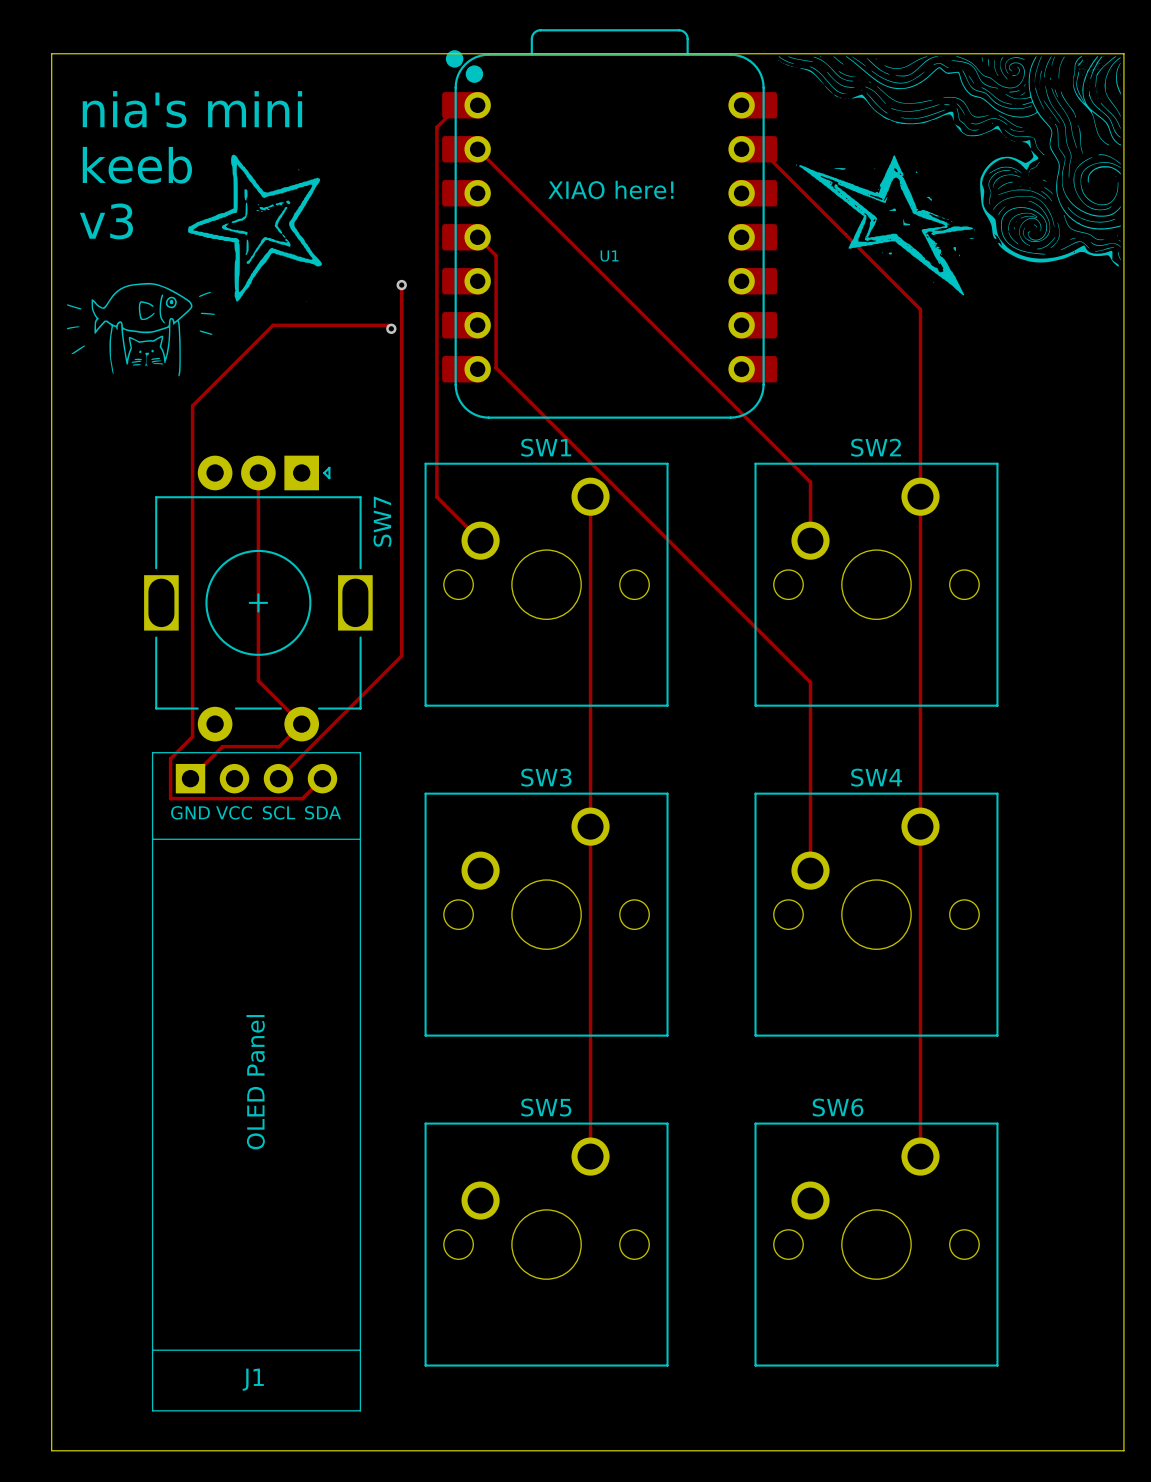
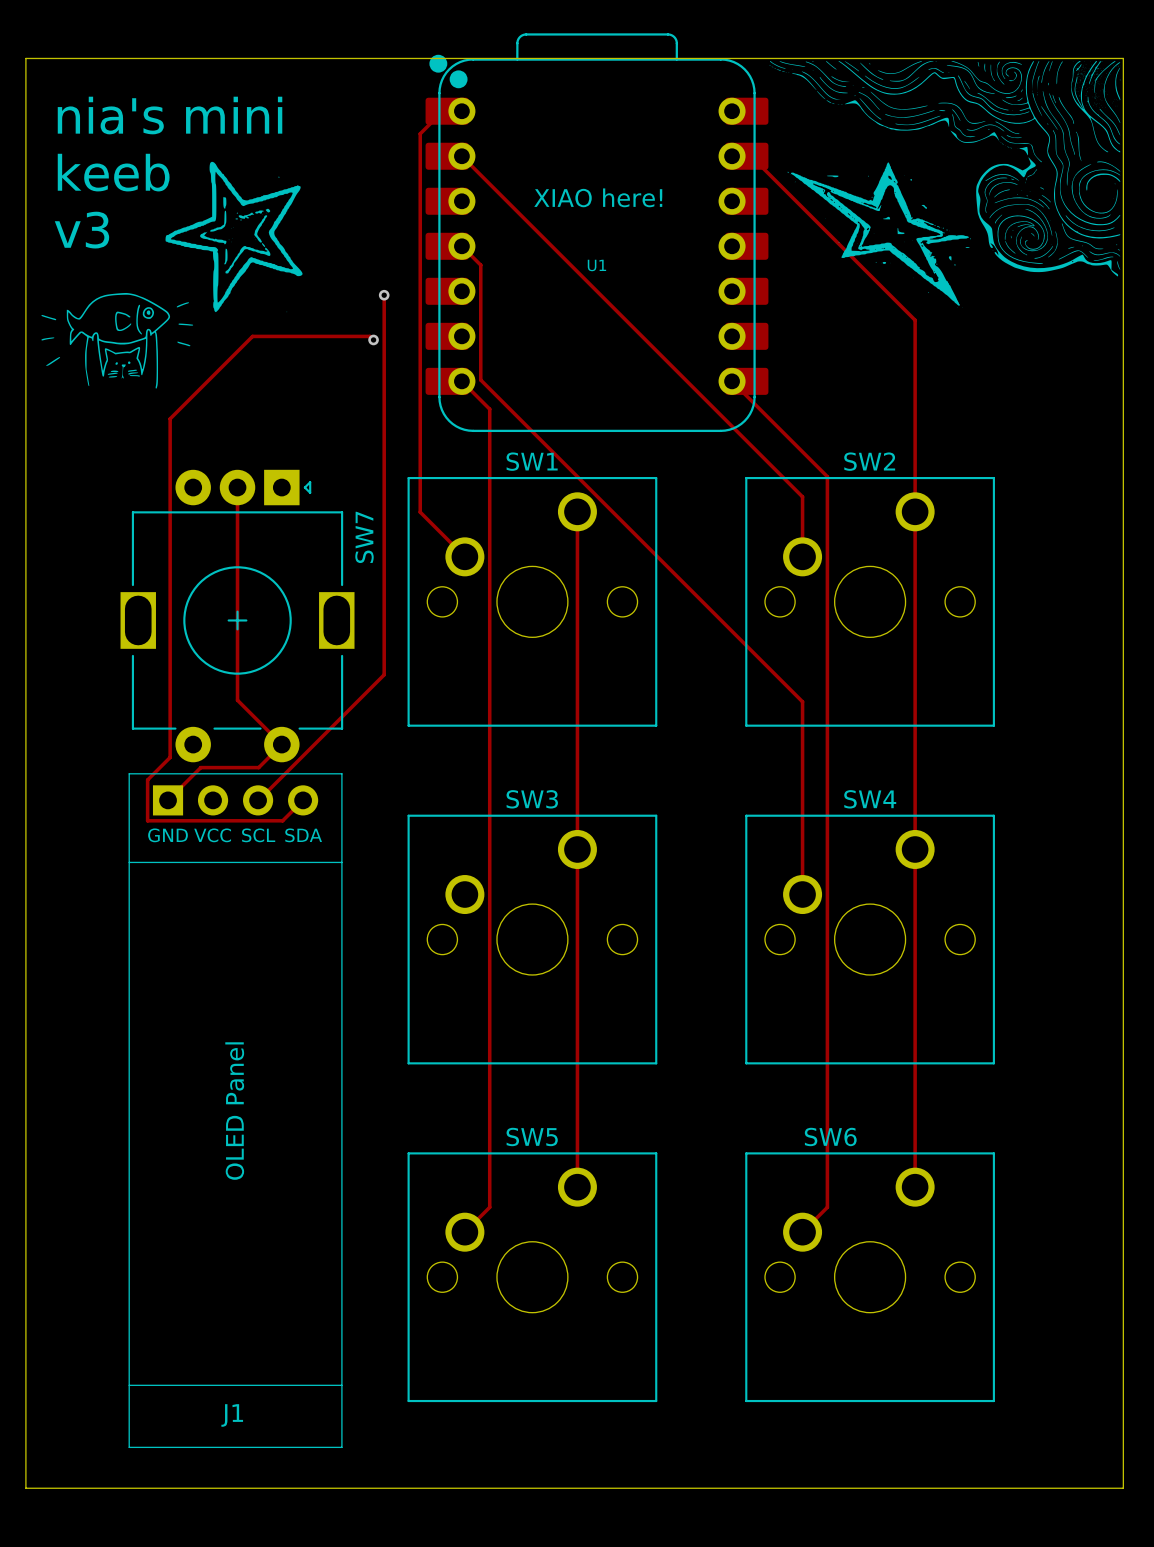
track: none -> (461, 381) (489, 409) (489, 1207) (464, 1232)
track: none -> (732, 381) (827, 476) (827, 1207) (802, 1232)

